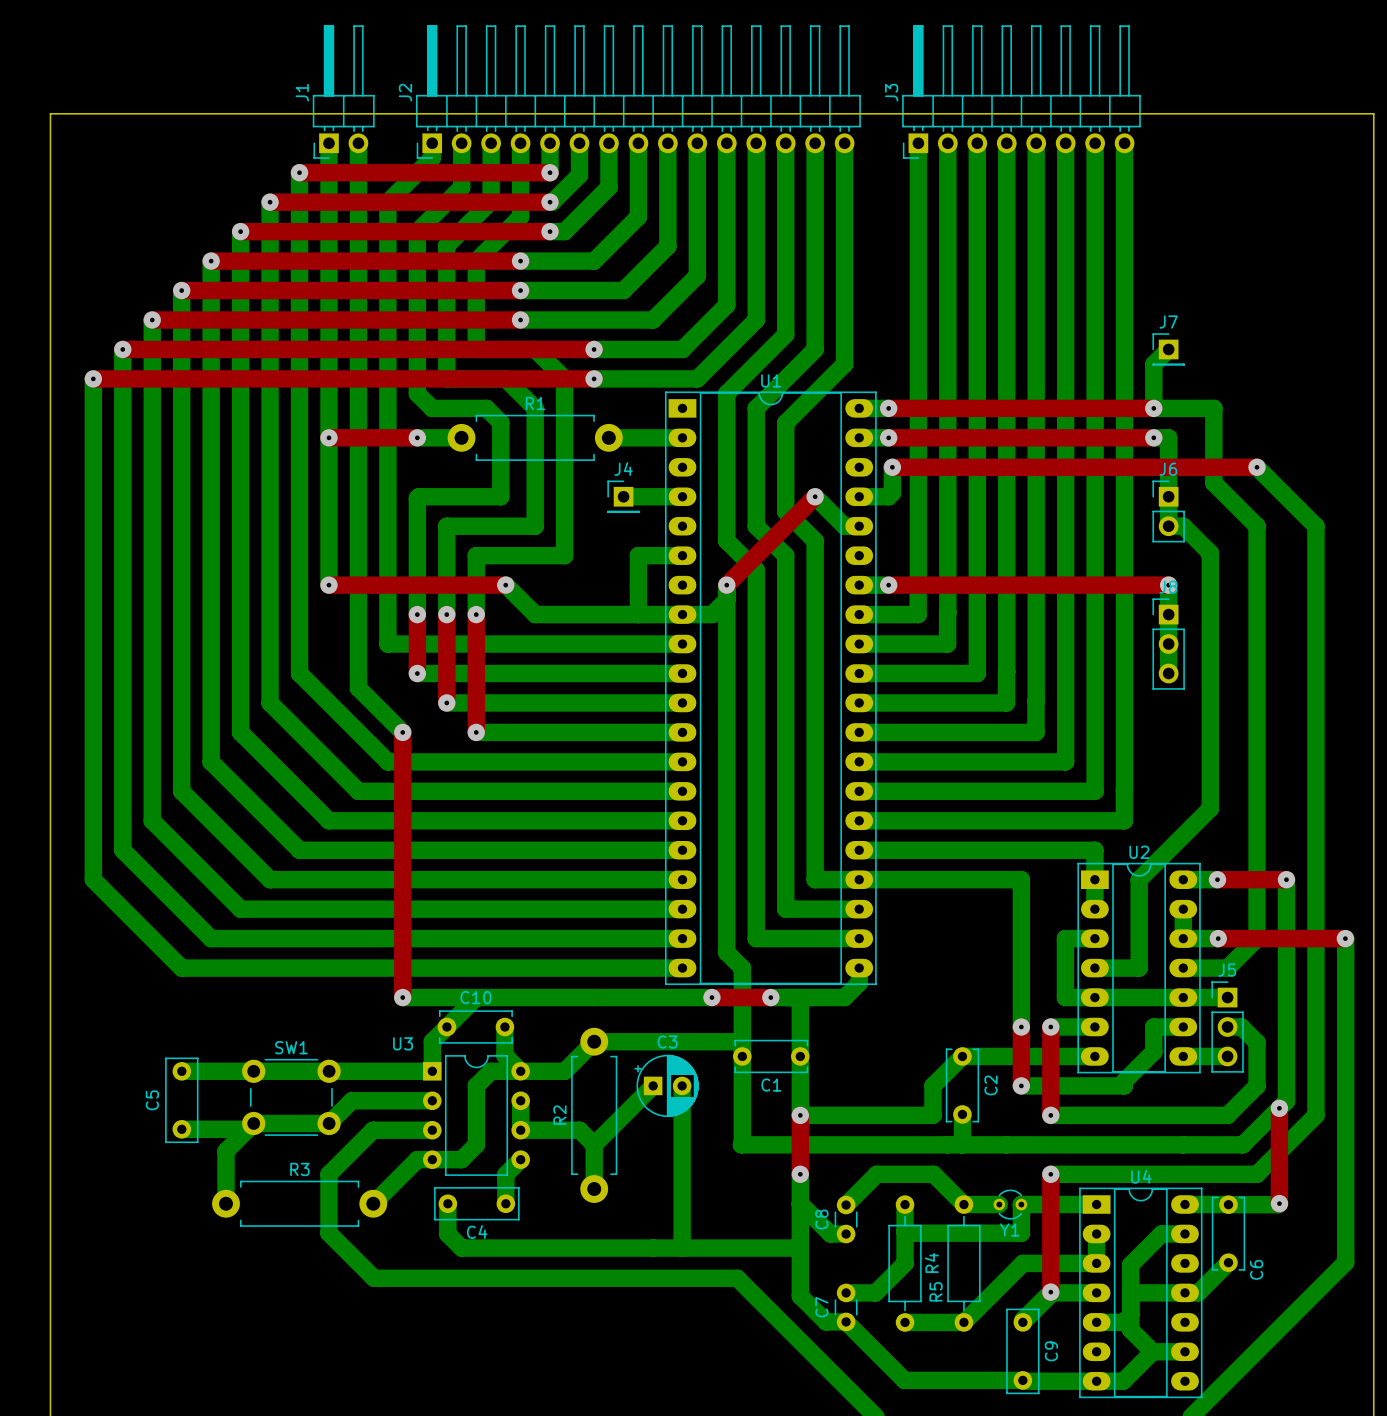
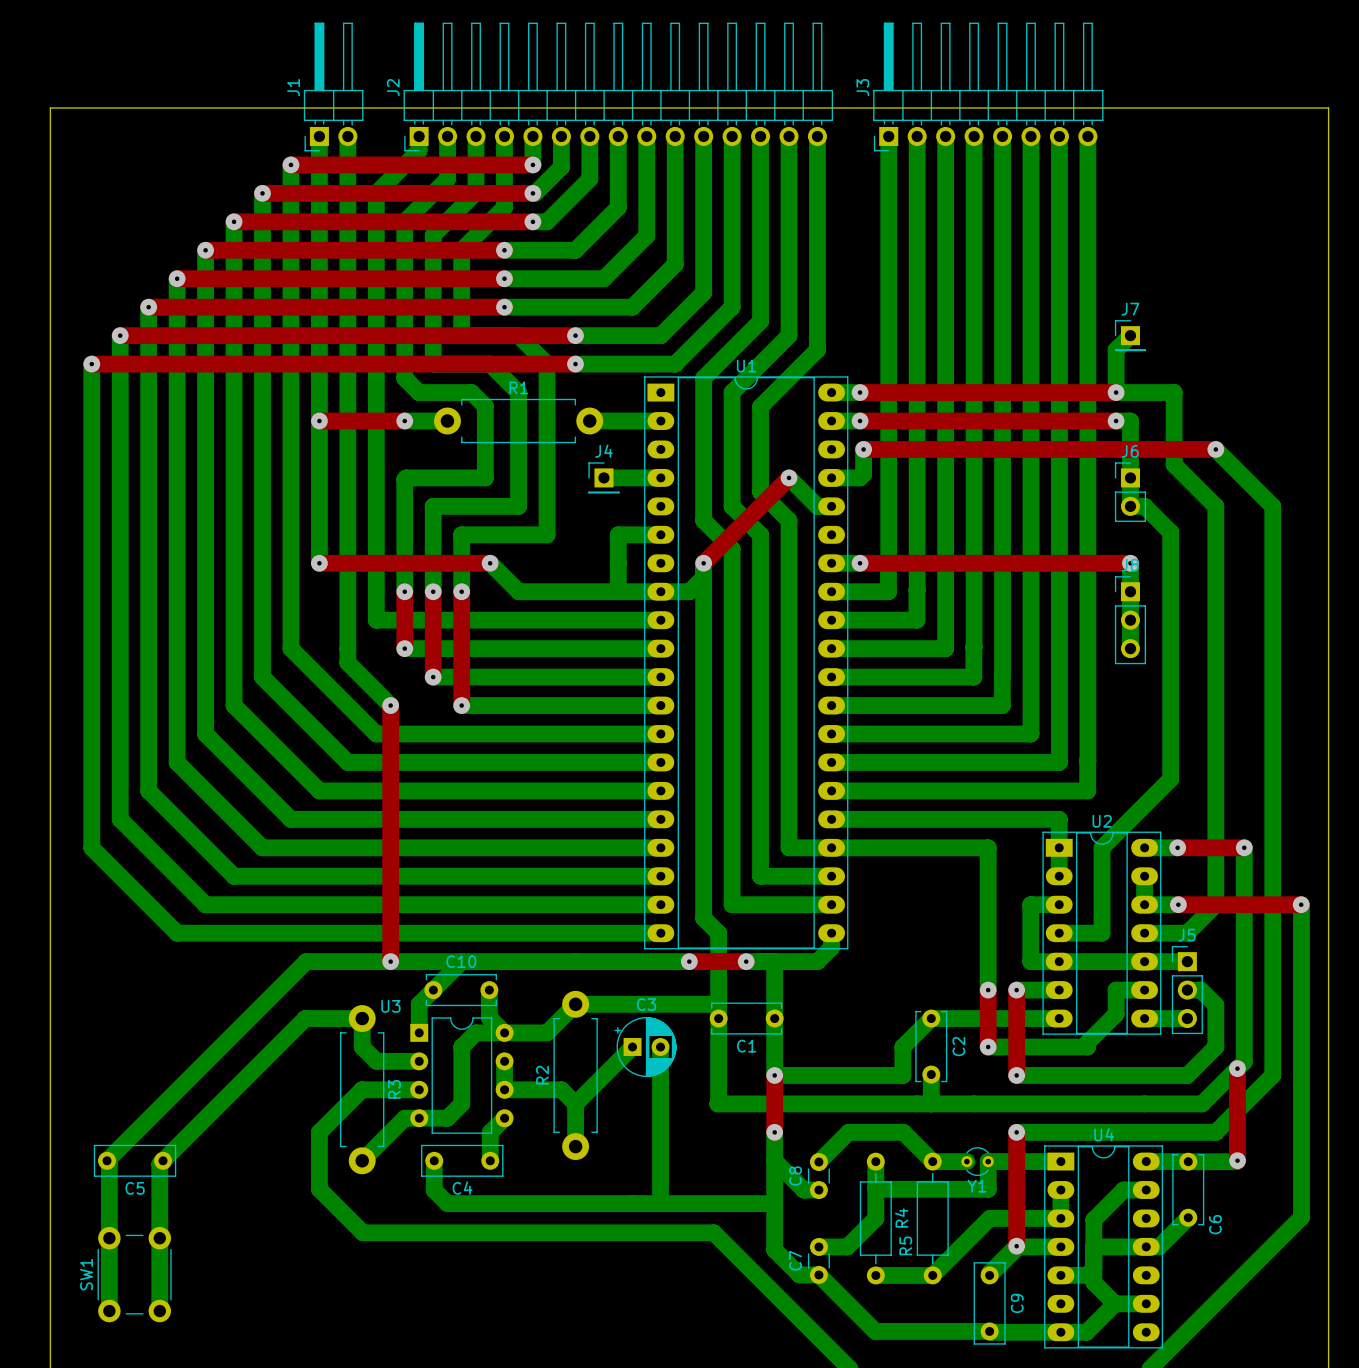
bottom track: none -> (390, 961) (306, 961) (107, 1160) (109, 1163) (109, 1311)
SW1 name position: SW1 (291, 1047) -> SW1 (86, 1274)
bottom track: (181, 1071) (432, 1071) -> none
SW1 rotation: 0° (291, 1097) -> 90° clockwise (134, 1274)
SW1 position: (291, 1097) -> (134, 1274)
C5 name position: C5 (152, 1100) -> C5 (135, 1188)
C5 rotation: 0° (181, 1100) -> 90° clockwise (135, 1160)
C5 position: (181, 1100) -> (135, 1160)
bottom track: (388, 1100) (351, 1100) (329, 1123) (253, 1123) (225, 1151) (225, 1203) -> (376, 1061) (362, 1046) (362, 1018) (305, 1018) (159, 1164) (159, 1311)
bottom track: (181, 1129) (247, 1129) -> none
R3 rotation: 0° (299, 1203) -> 90° clockwise (362, 1089)

